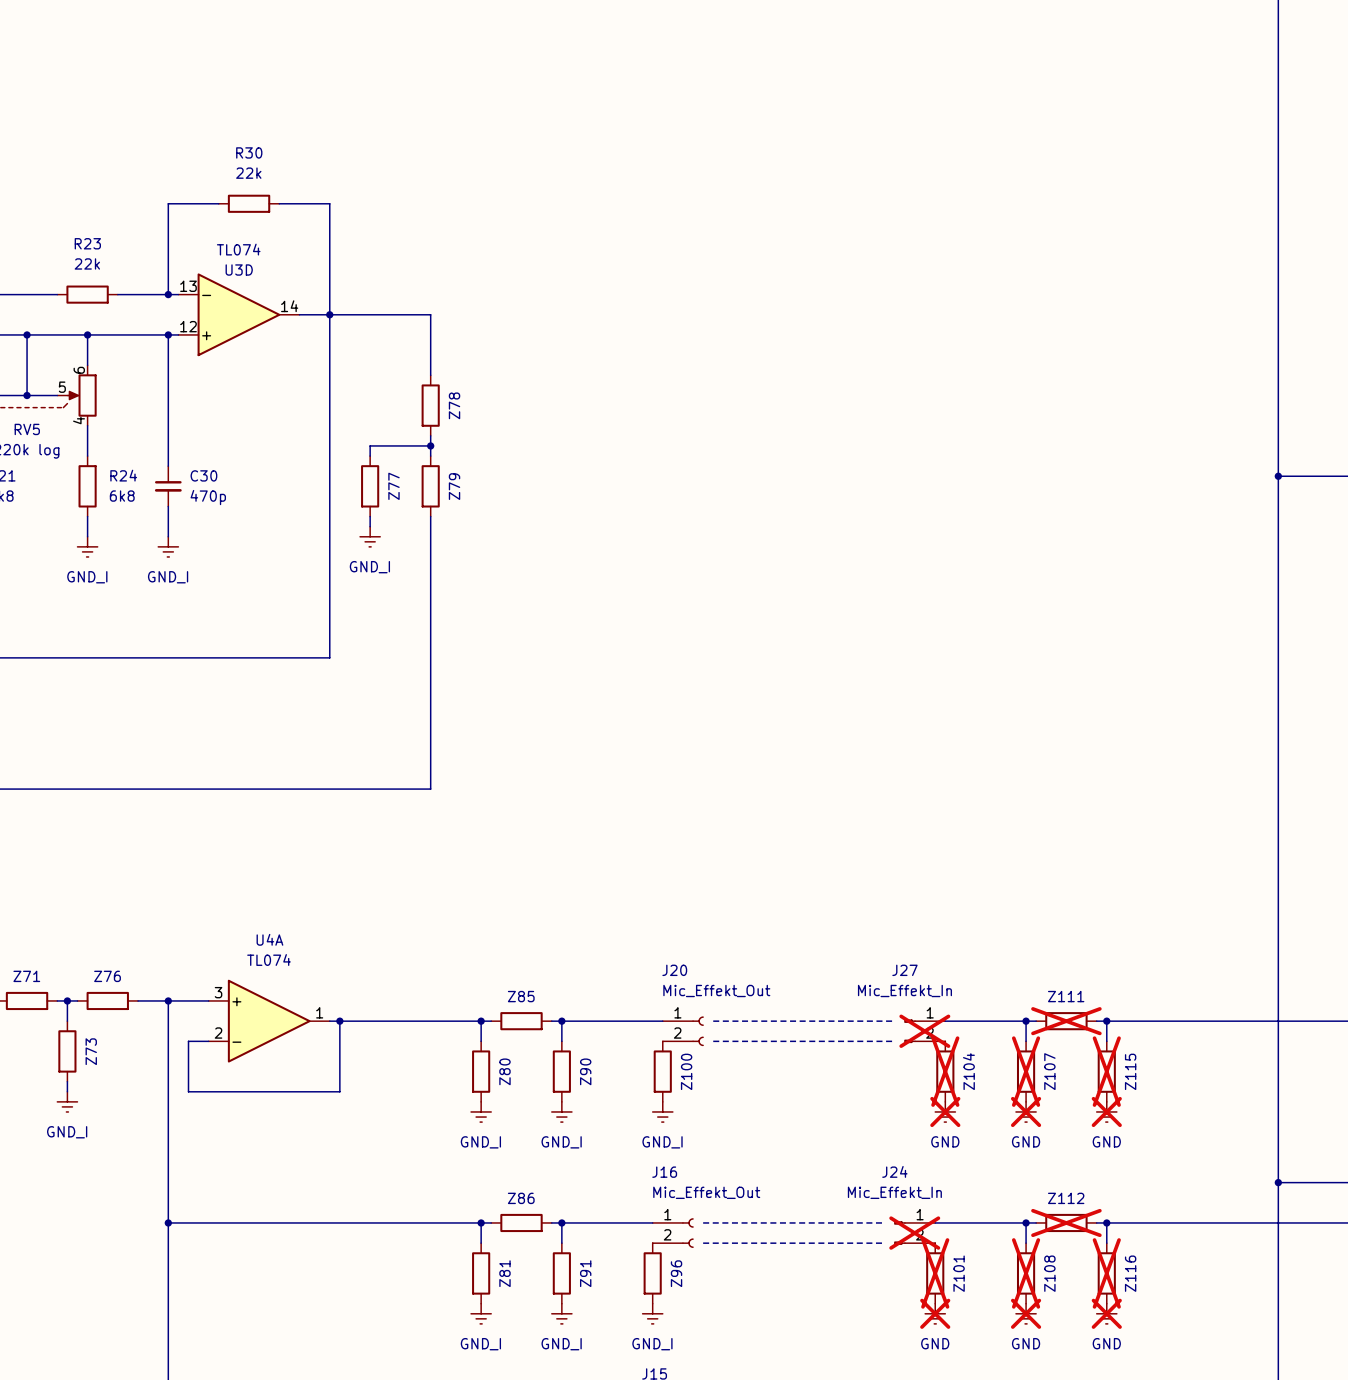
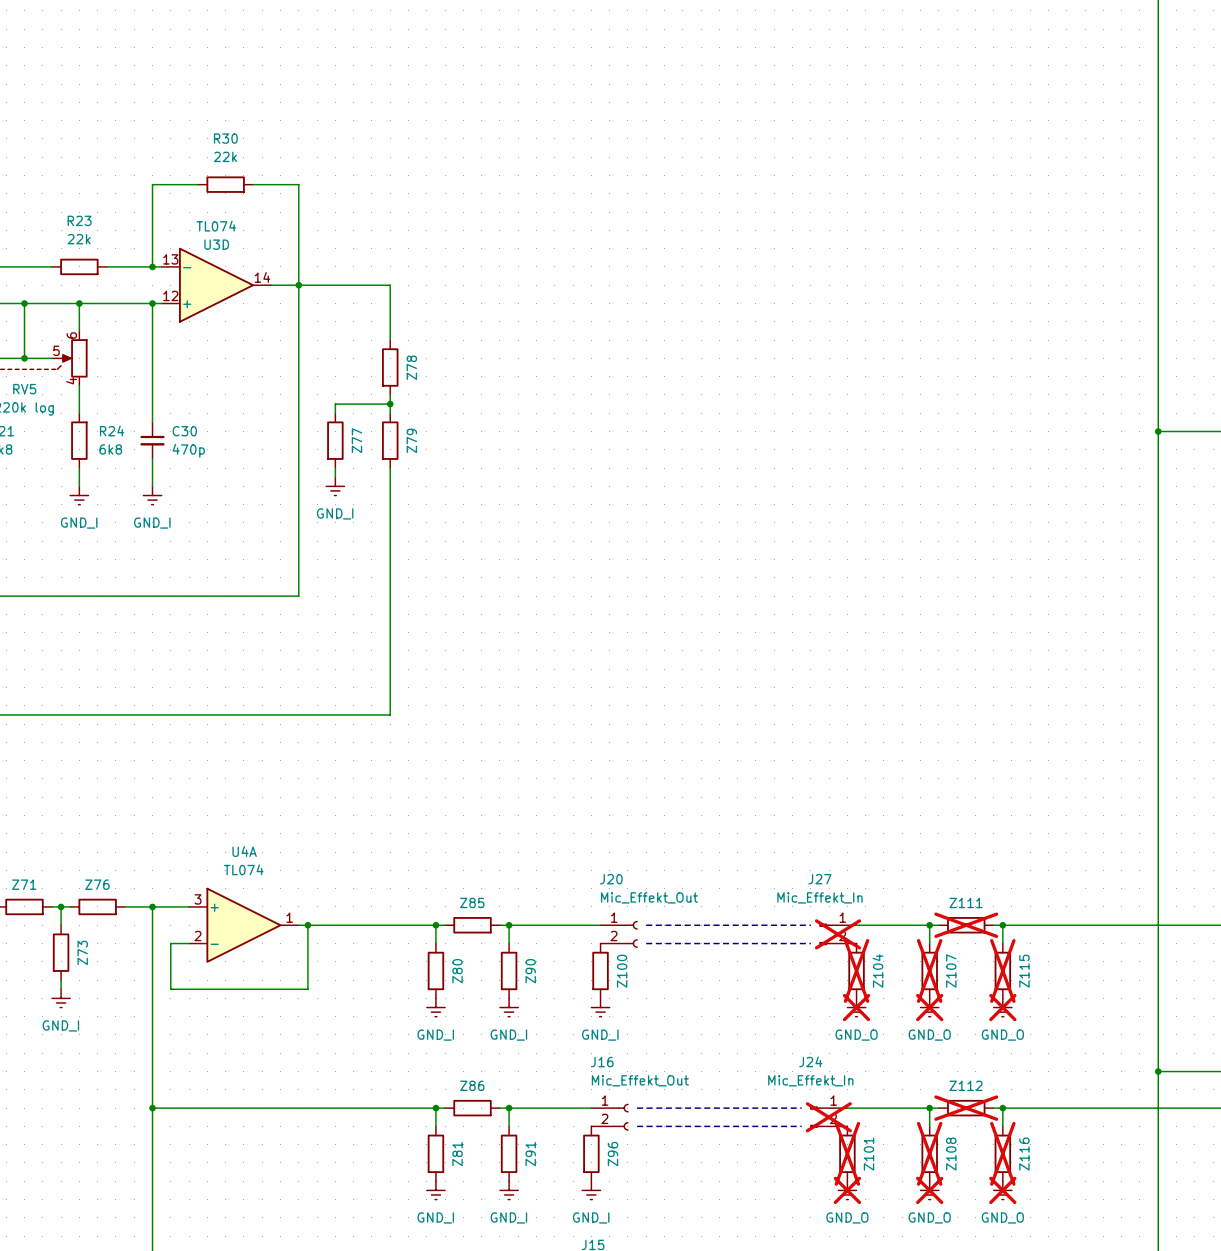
power symbol: GND (945, 1111) -> GND_O (856, 1007)
power symbol: GND (1026, 1111) -> GND_O (929, 1007)
power symbol: GND (1106, 1111) -> GND_O (1002, 1007)
power symbol: GND (935, 1313) -> GND_O (847, 1190)
power symbol: GND (1026, 1313) -> GND_O (929, 1190)
power symbol: GND (1106, 1313) -> GND_O (1002, 1190)

